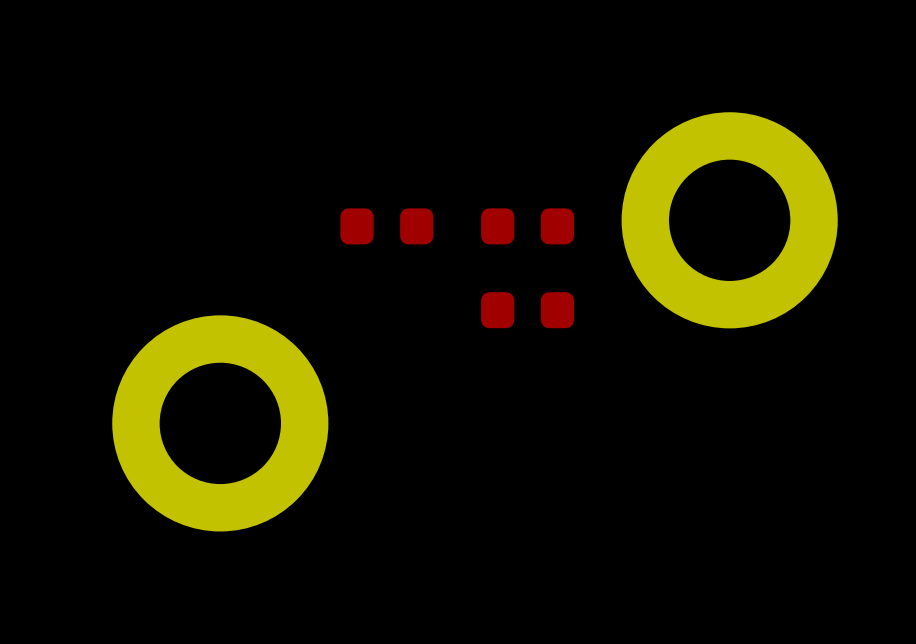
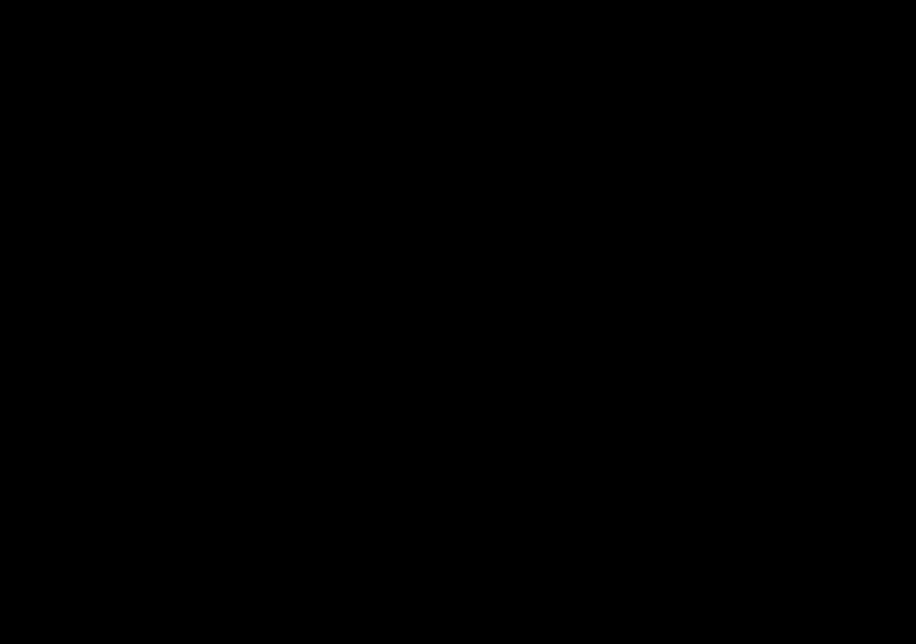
part: (729, 220) -> none
part: (386, 226) -> none
part: (527, 226) -> none
part: (527, 310) -> none
part: (220, 423) -> none

